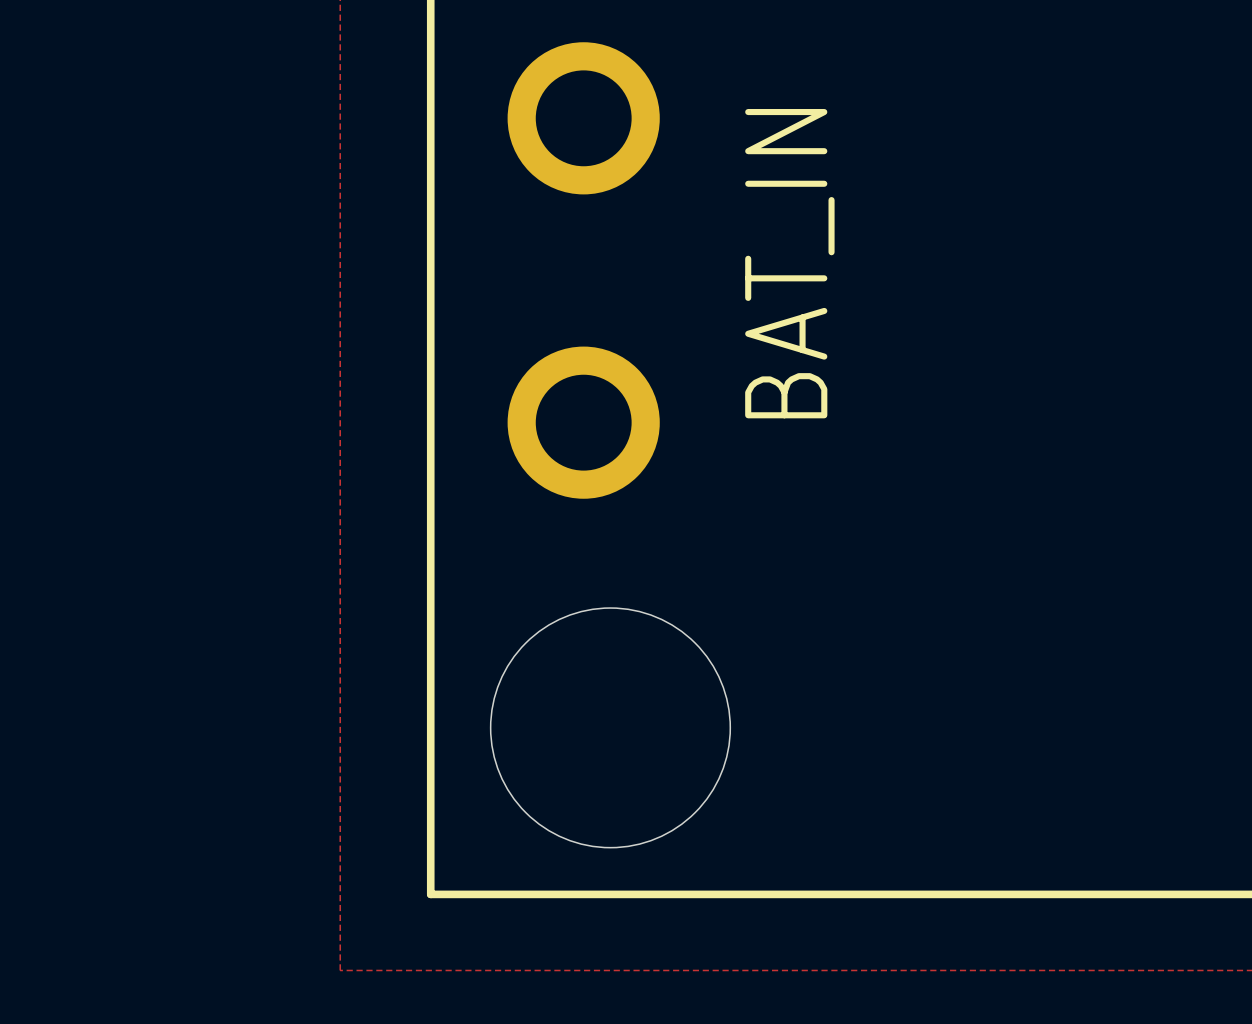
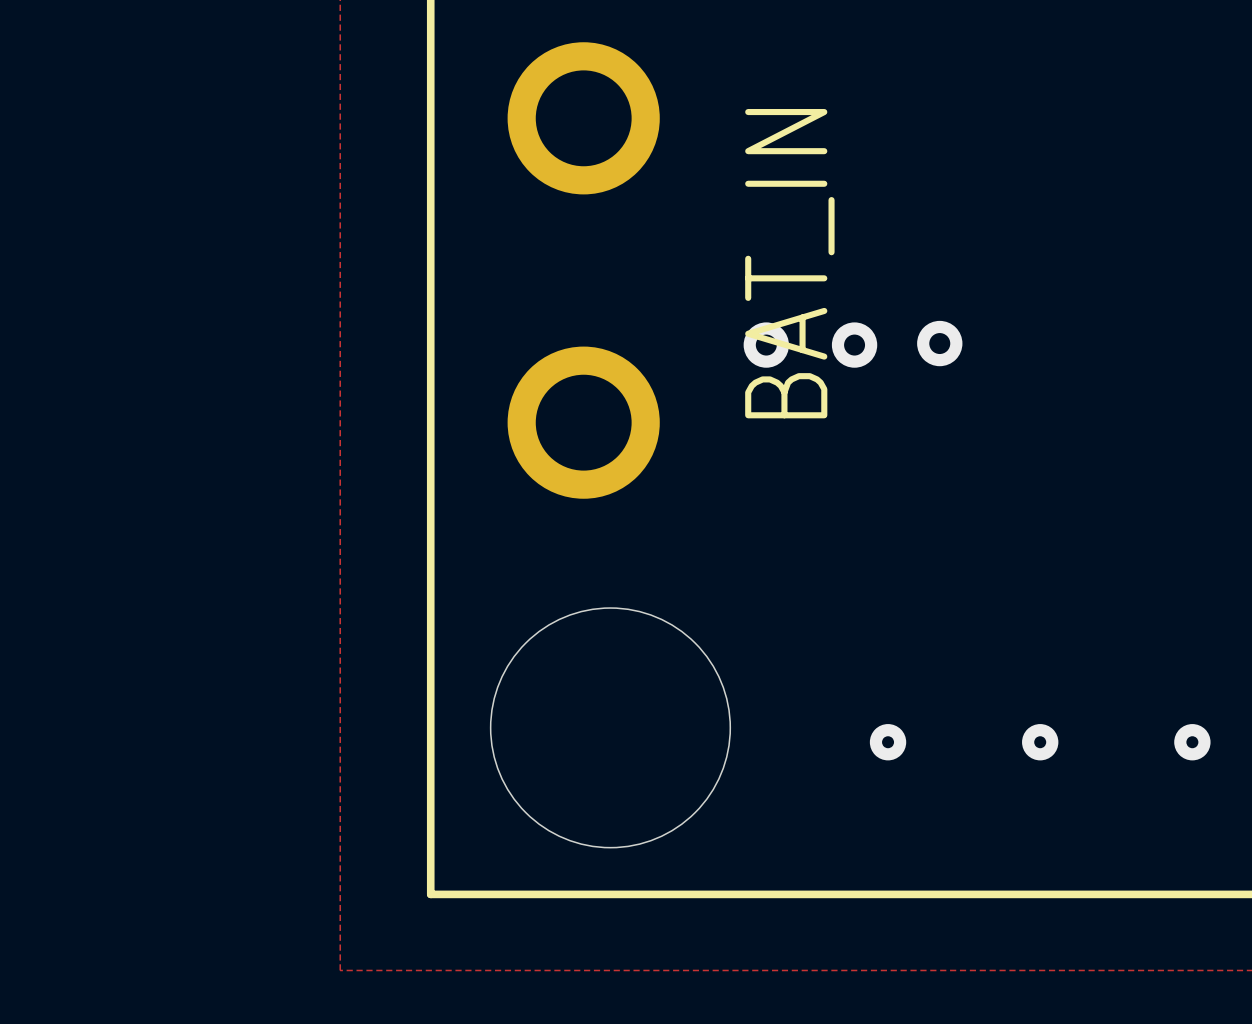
via: none -> (939, 343)
via: none -> (766, 345)
via: none -> (854, 345)
via: none -> (888, 742)
via: none -> (1040, 742)
via: none -> (1192, 742)

